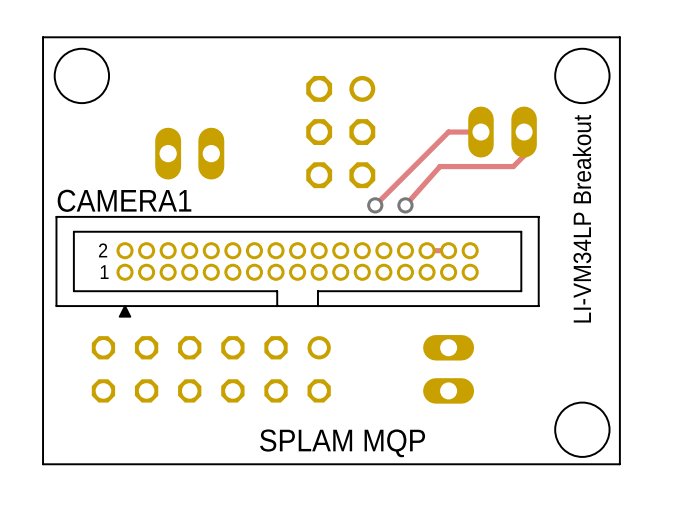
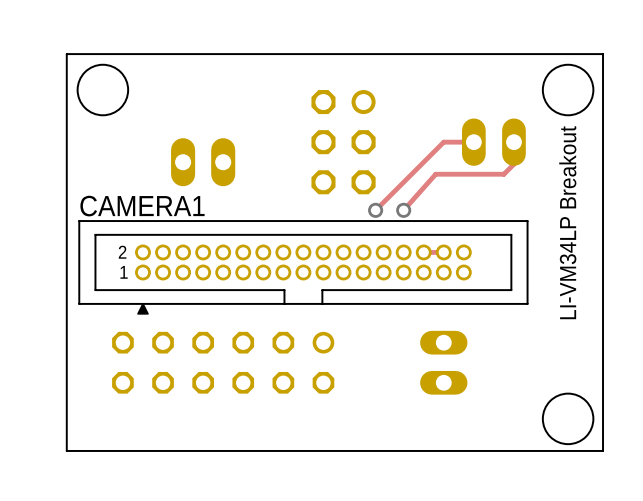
text: SPLAM MQP (342, 443) -> none

